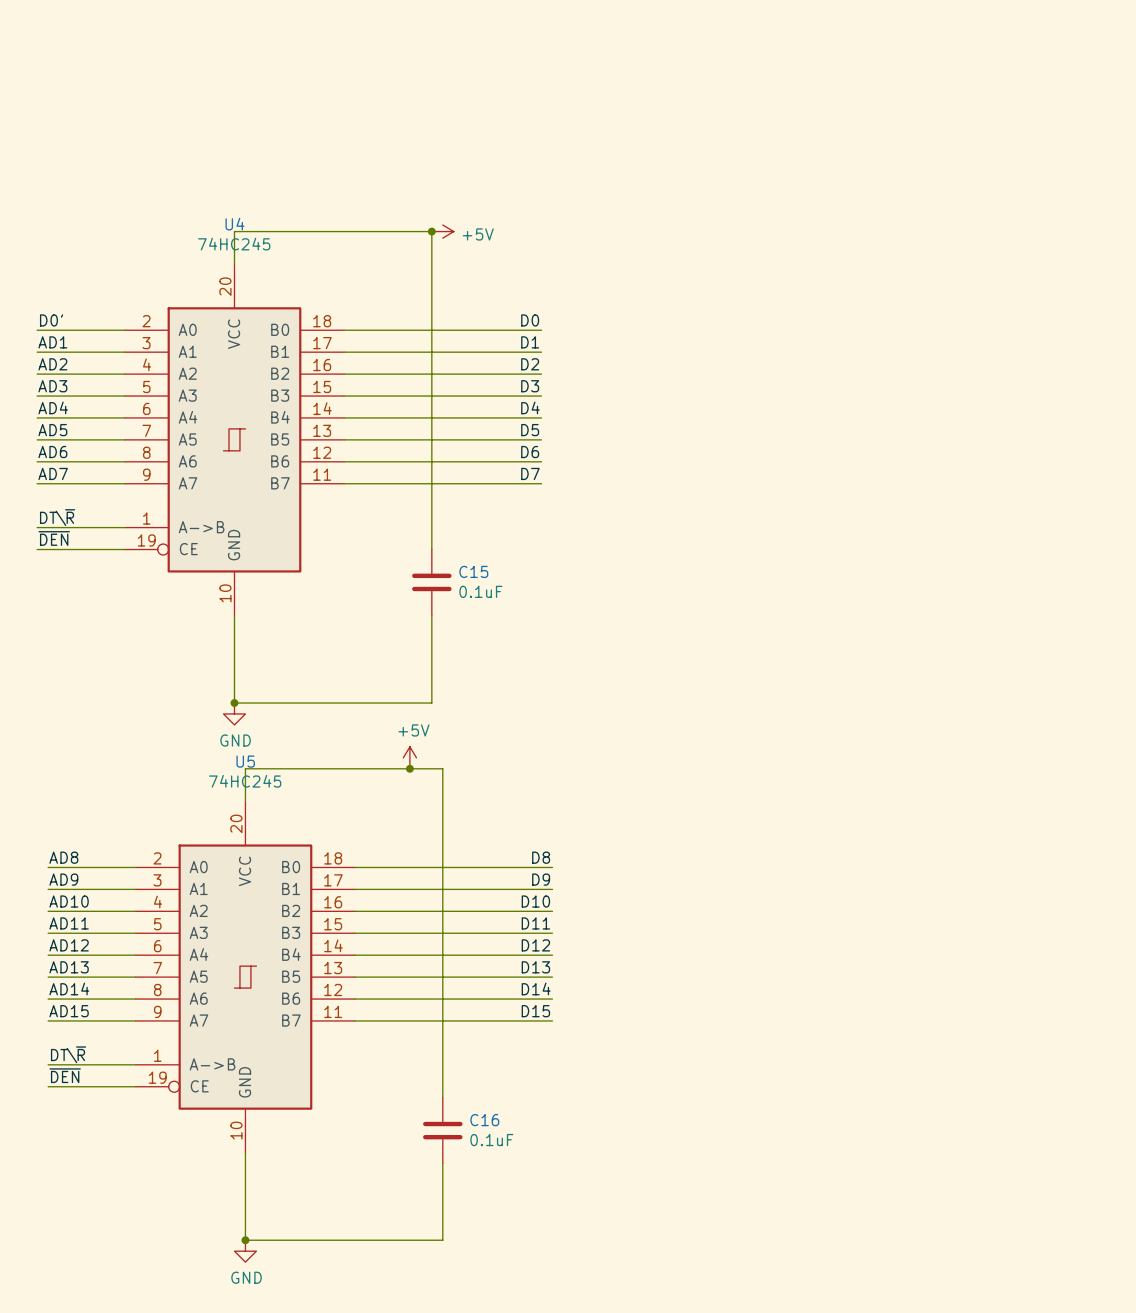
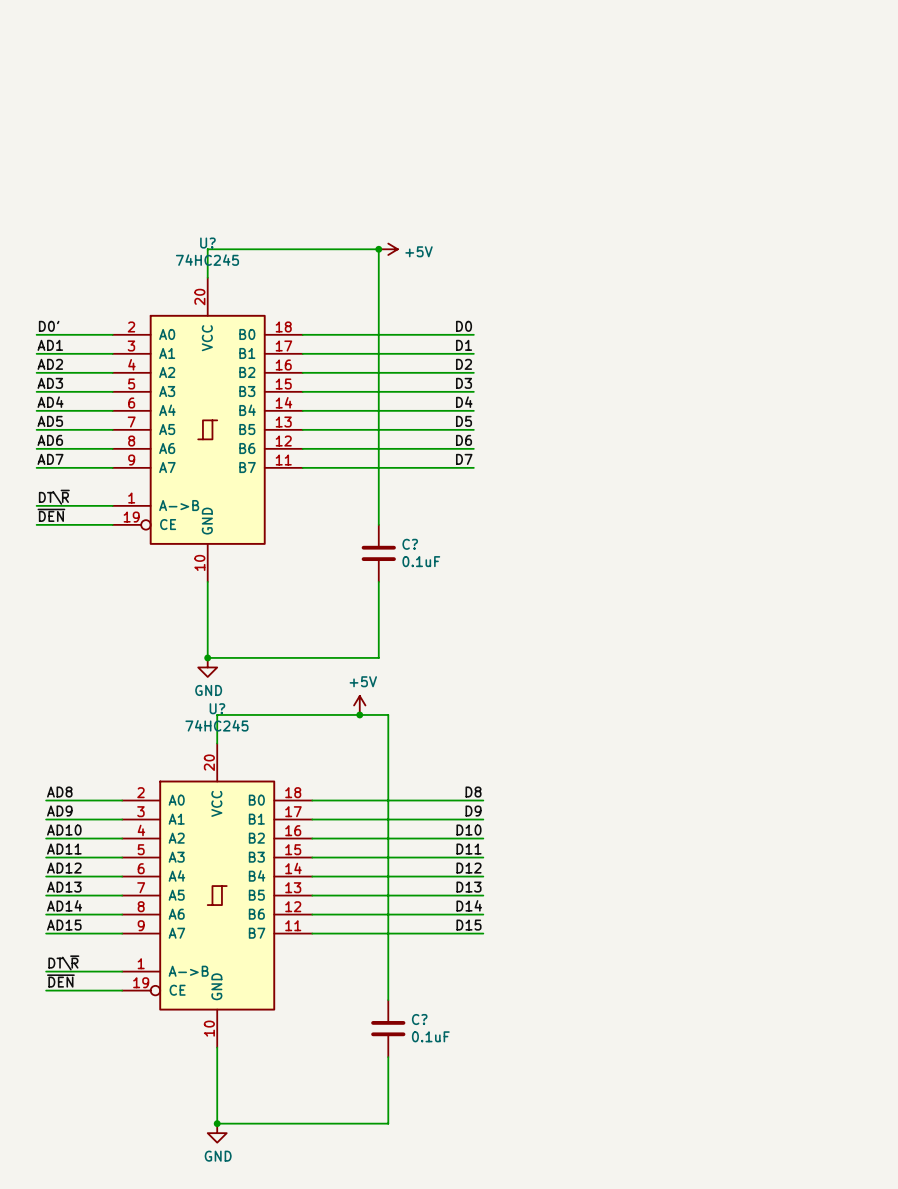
U4 name: U4 (235, 224) -> U? (207, 243)
C15 name: C15 (473, 571) -> C? (410, 544)
U5 name: U5 (245, 761) -> U? (217, 708)
C16 name: C16 (484, 1120) -> C? (419, 1019)

